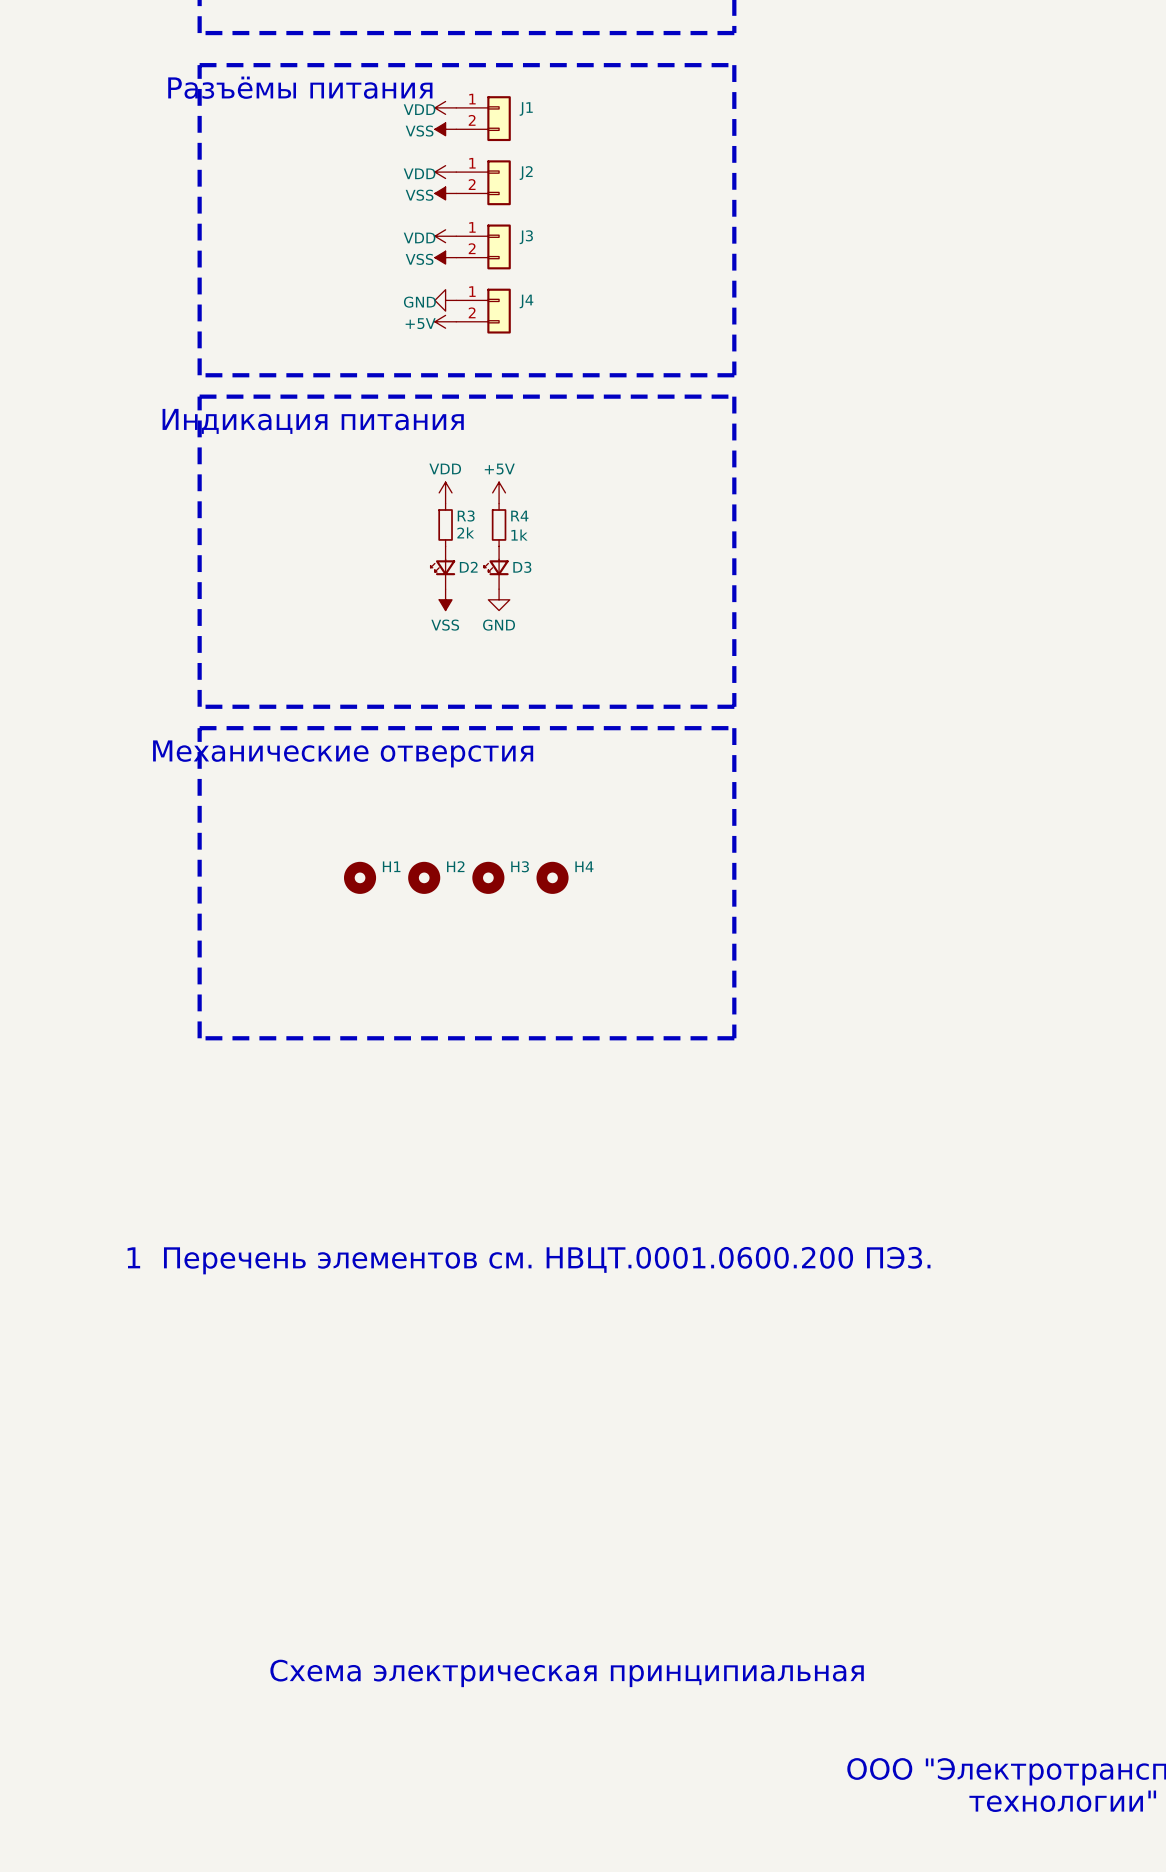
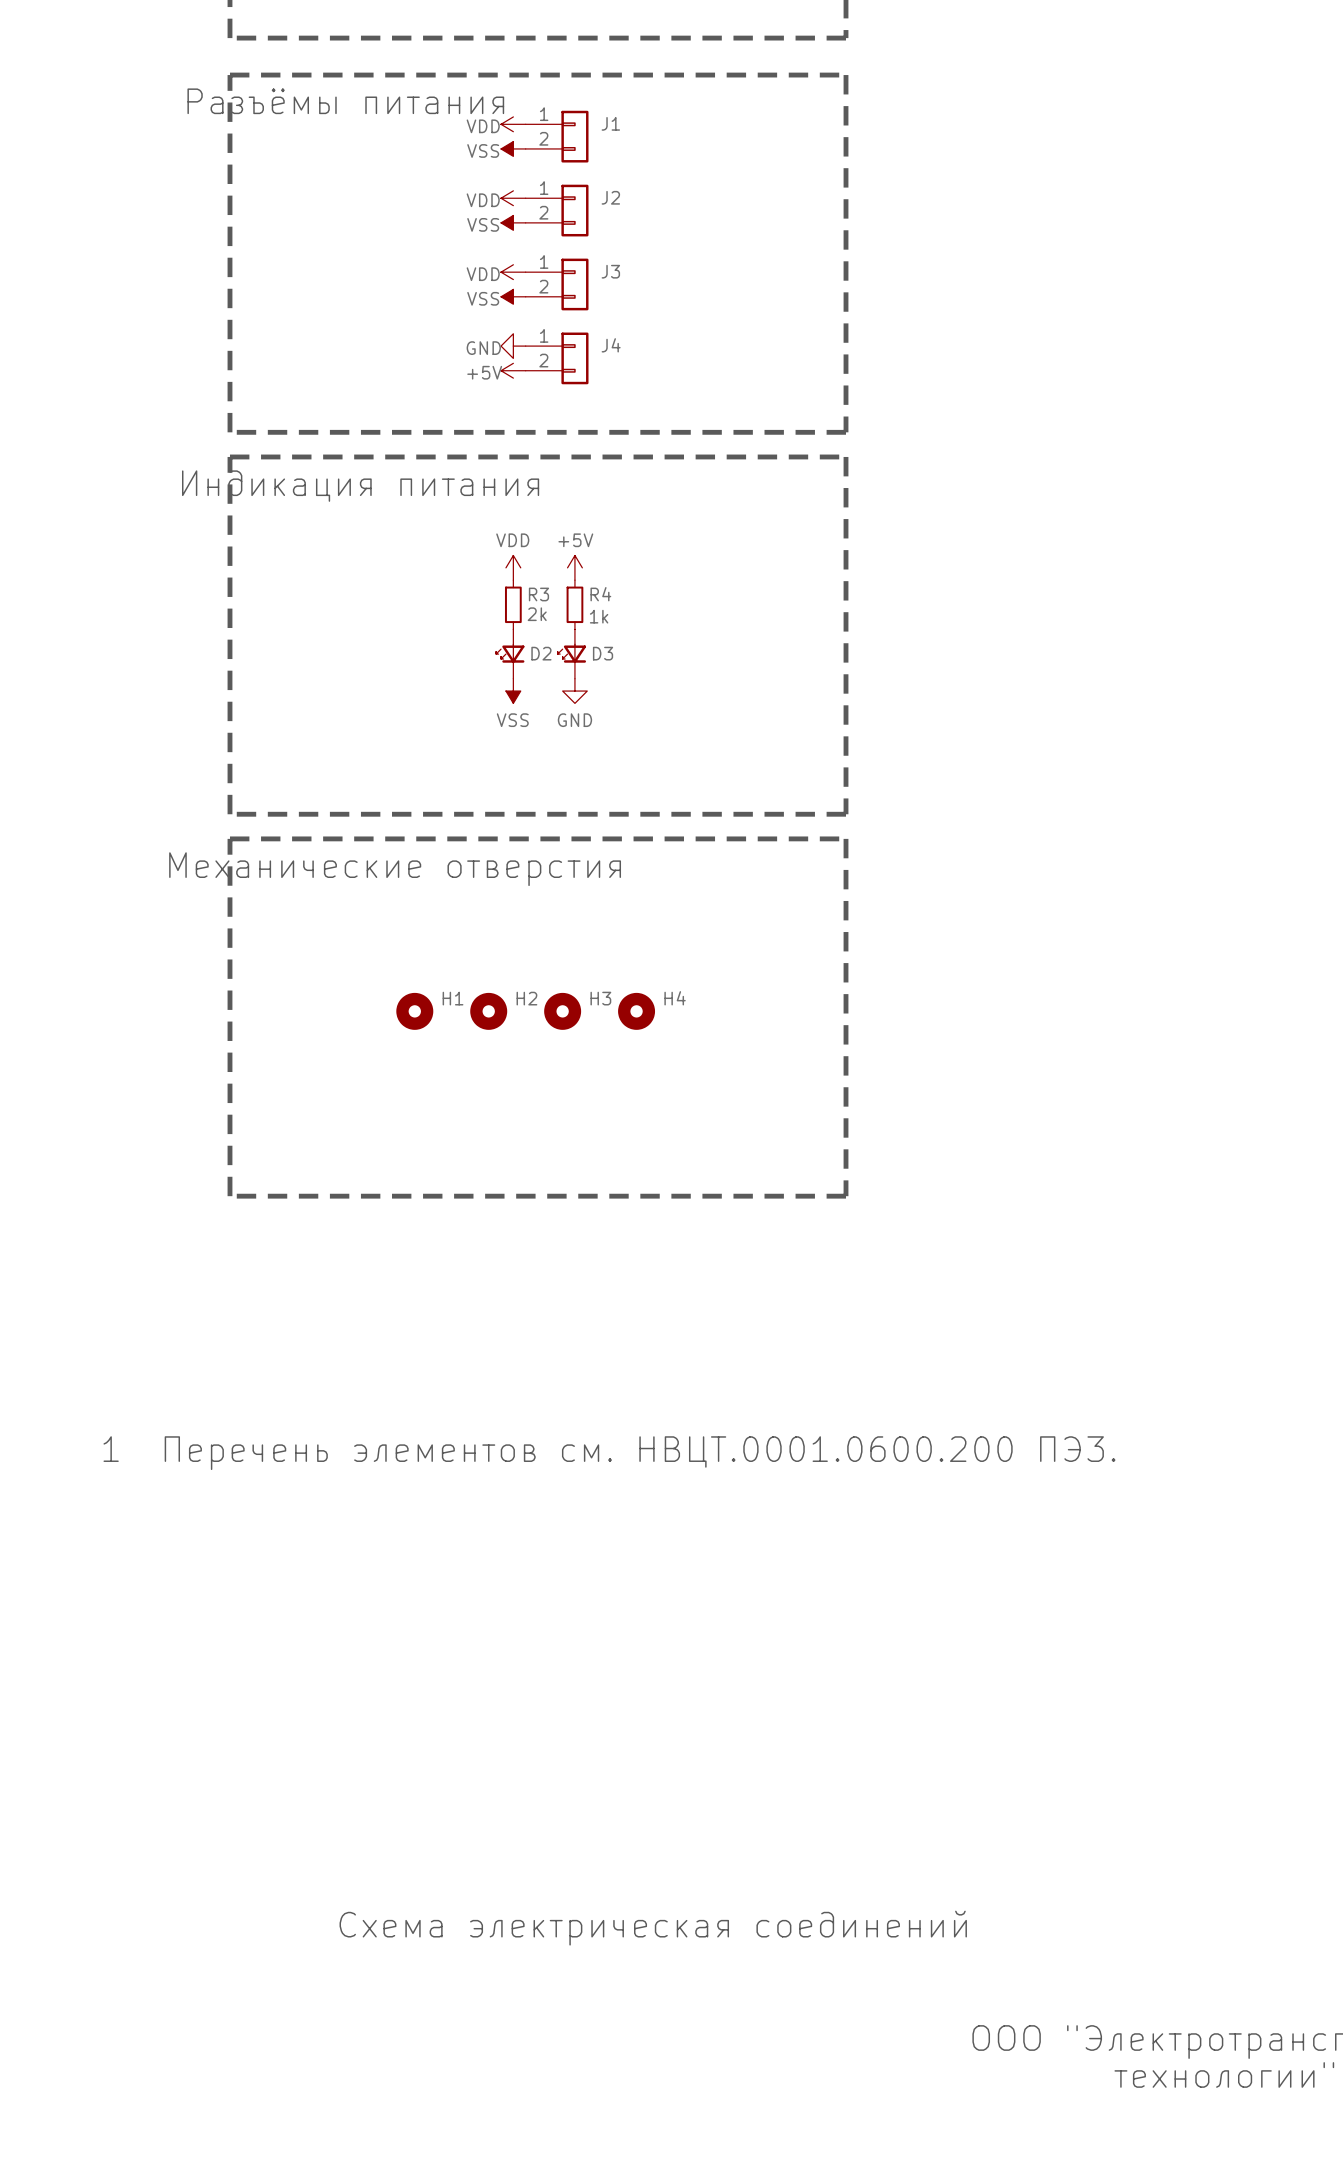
text: Схема электрическая принципиальная (567, 1673) -> Схема электрическая соединений (653, 1928)

